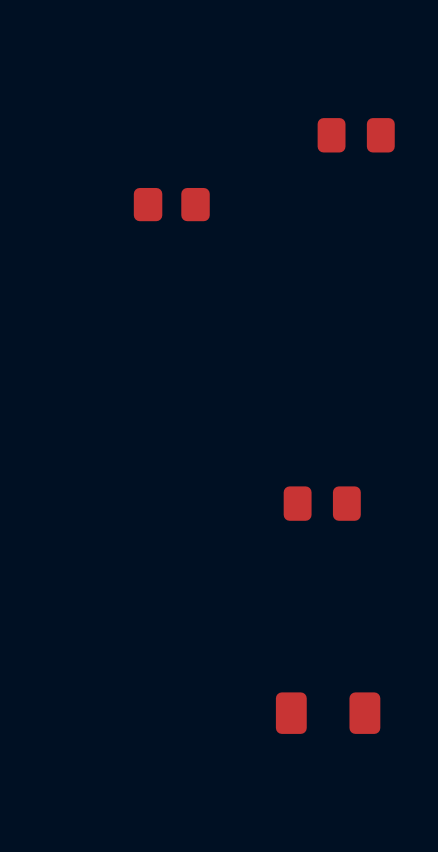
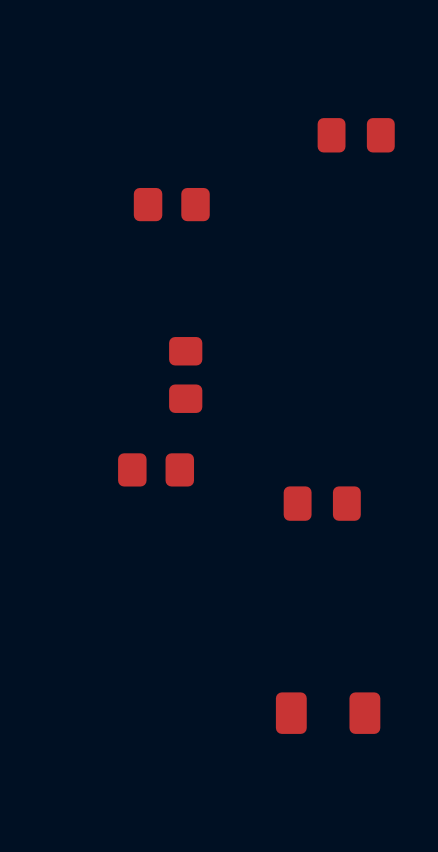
part: none -> (185, 374)
part: none -> (156, 469)

